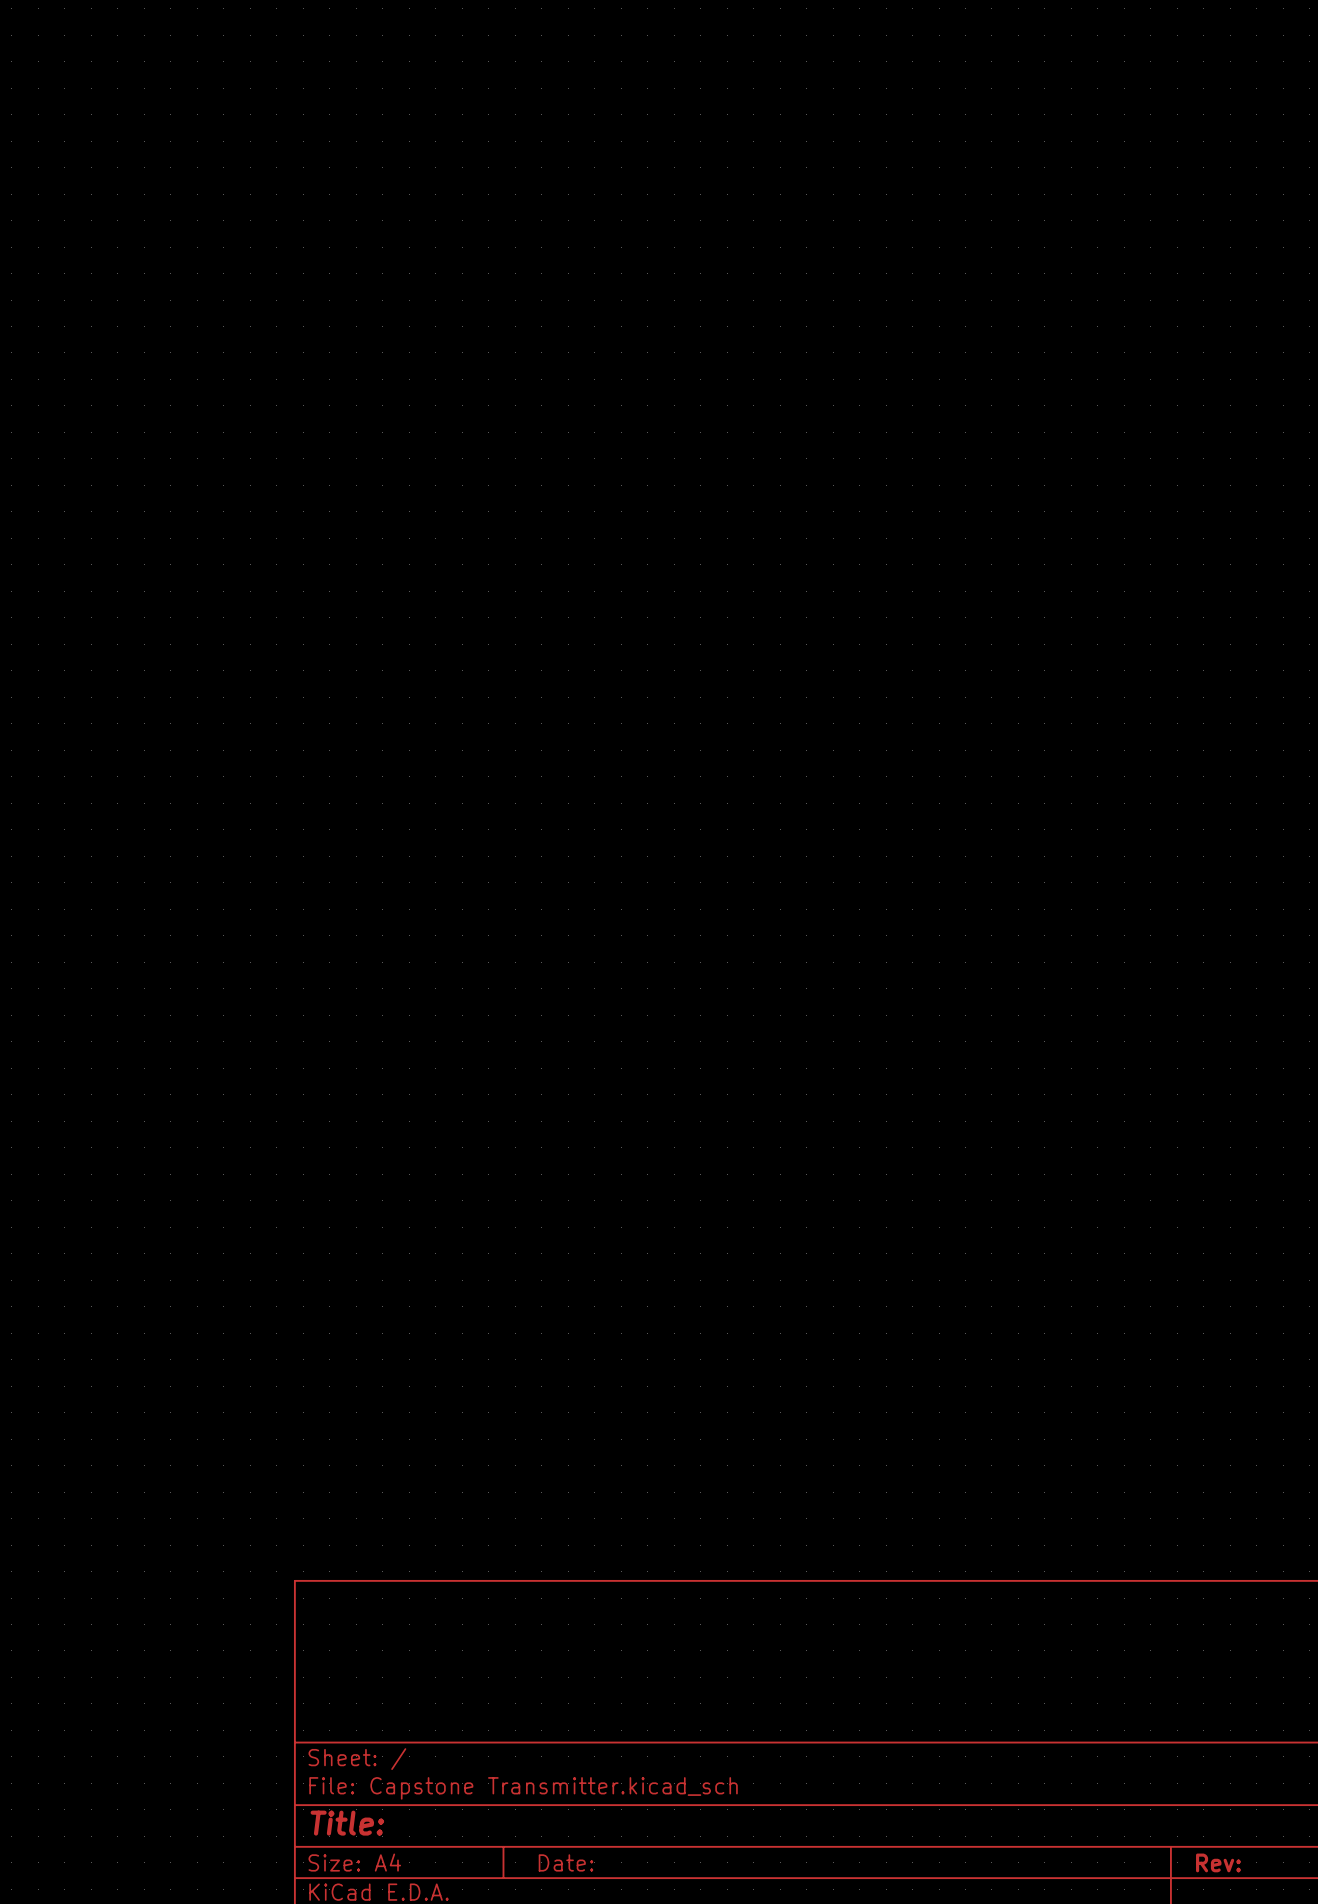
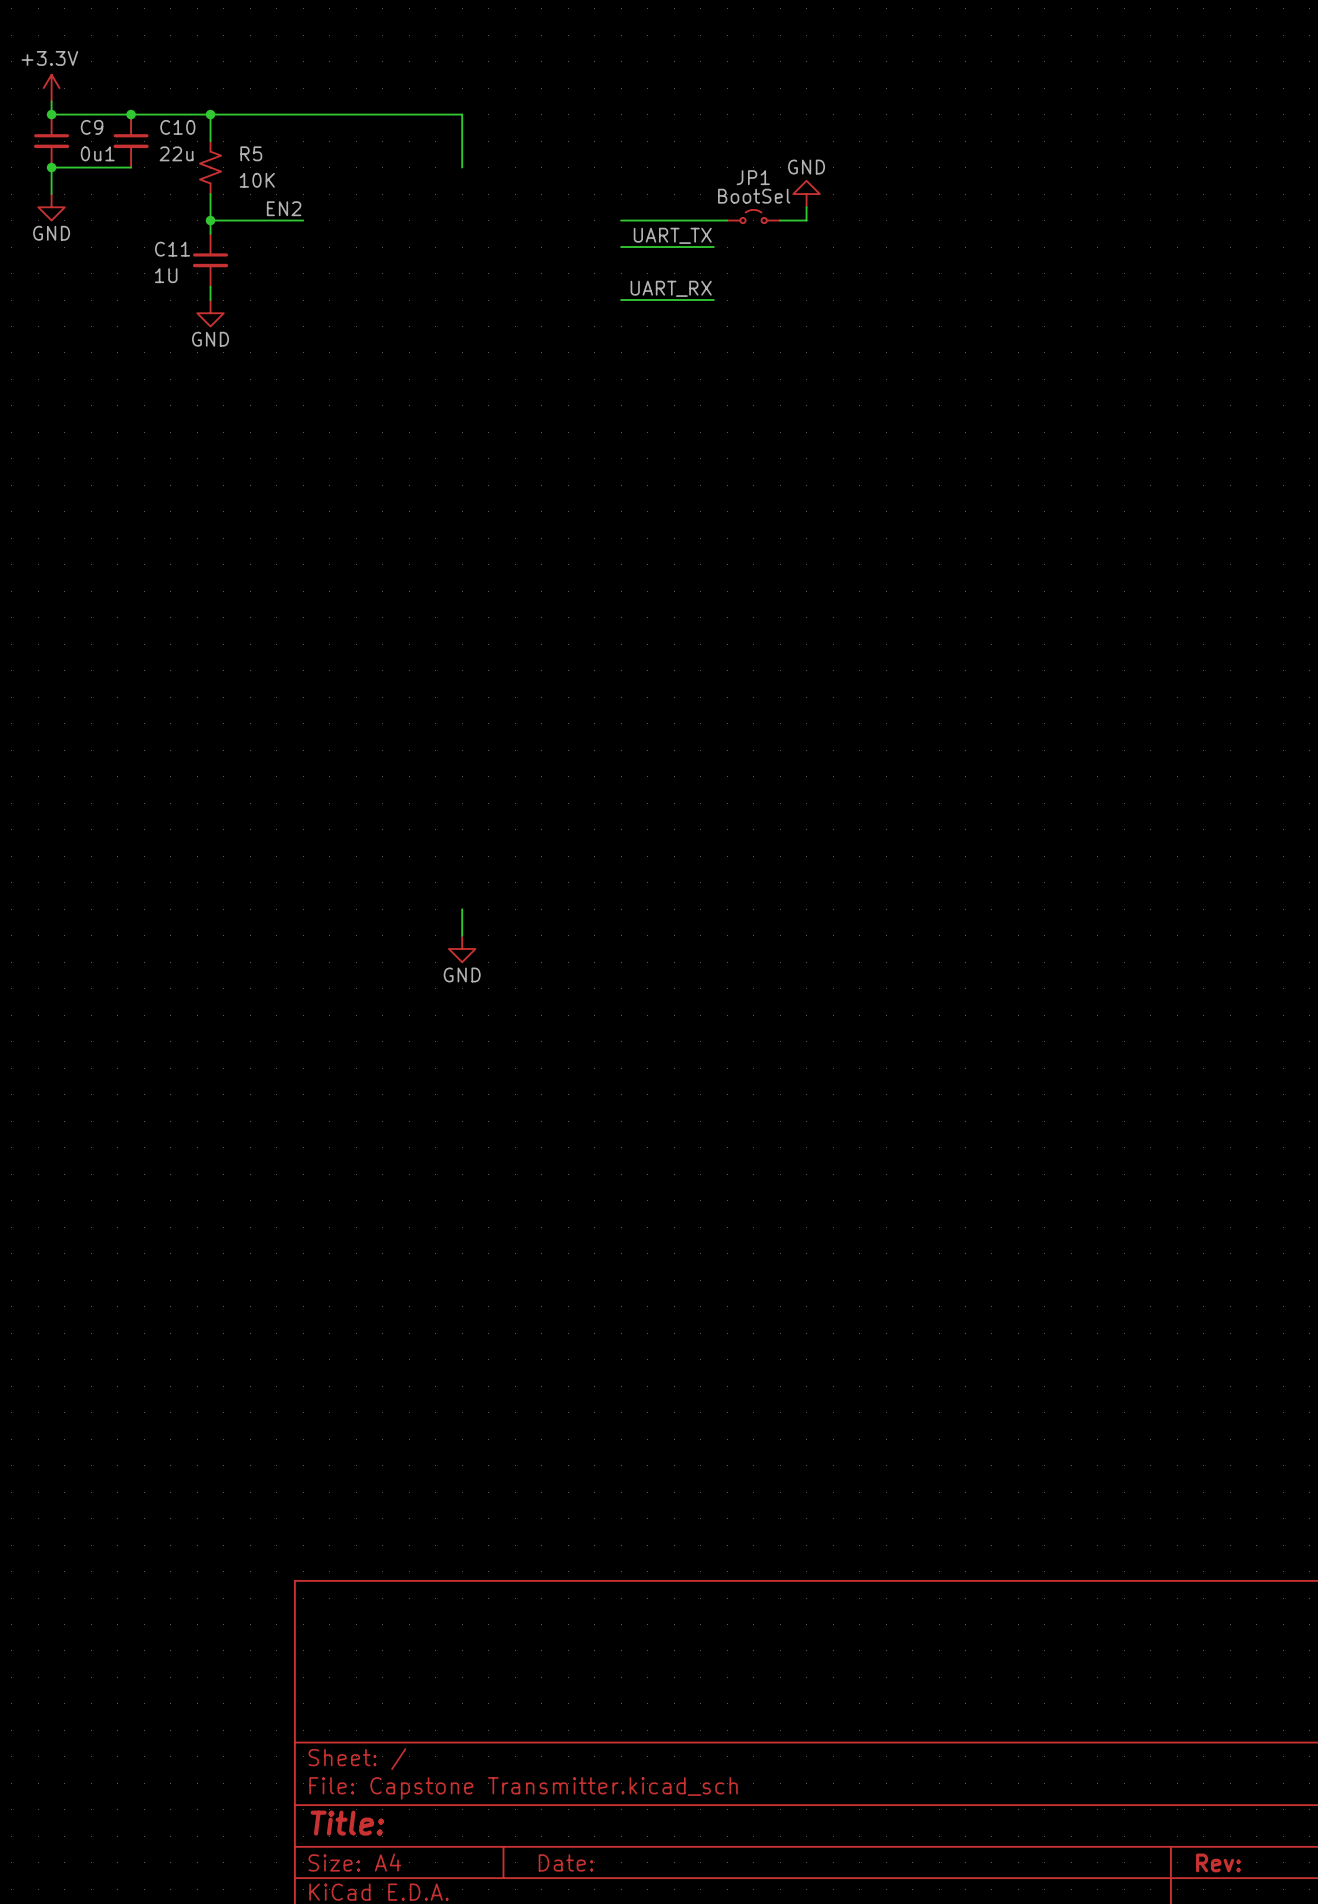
power symbol: none -> +3.3V (51, 88)
wire: none -> (51, 101) (51, 114) (462, 114) (462, 167)
junction: none -> (51, 114)
junction: none -> (131, 114)
wire: none -> (210, 114) (210, 141)
junction: none -> (210, 114)
C9: none -> 0u1 (51, 141)
C10: none -> 22u (131, 141)
junction: none -> (51, 167)
wire: none -> (131, 167) (51, 167) (51, 194)
R5: none -> 10K (210, 167)
wire: none -> (210, 194) (210, 233)
power symbol: none -> GND (806, 194)
power symbol: none -> GND (51, 207)
wire: none -> (806, 207) (806, 220) (780, 220)
label: none -> EN2 (284, 208)
JP1: none -> BootSel (753, 216)
wire: none -> (210, 220) (303, 220)
junction: none -> (210, 220)
wire: none -> (621, 220) (727, 220)
label: none -> UART_TX (672, 235)
wire: none -> (621, 247) (713, 247)
C11: none -> 1U (210, 260)
wire: none -> (210, 286) (210, 300)
label: none -> UART_RX (671, 288)
wire: none -> (621, 300) (713, 300)
power symbol: none -> GND (210, 313)
wire: none -> (462, 909) (462, 935)
power symbol: none -> GND (462, 949)

